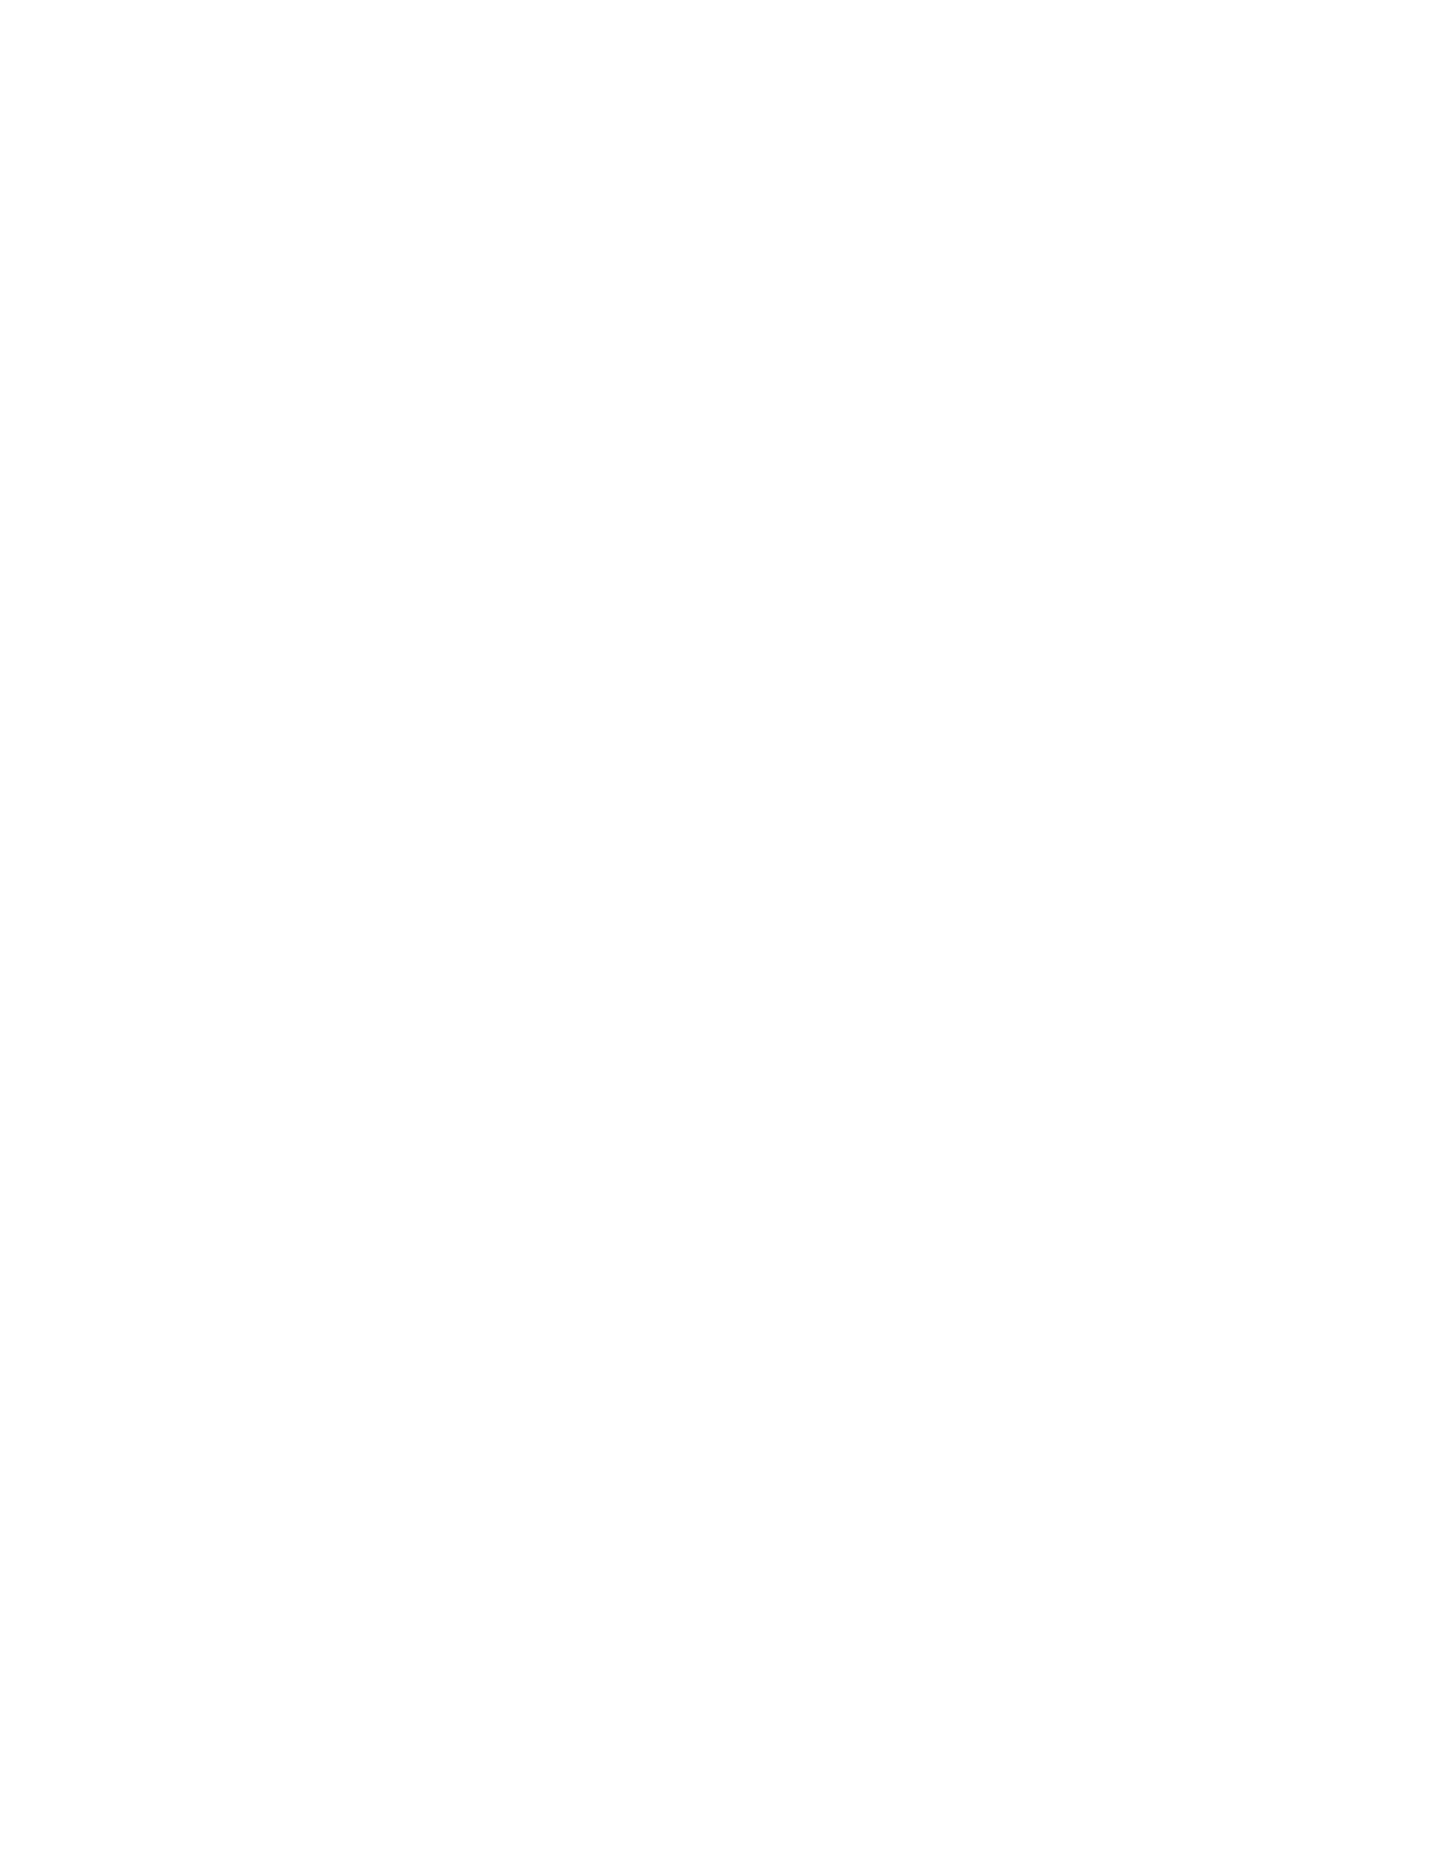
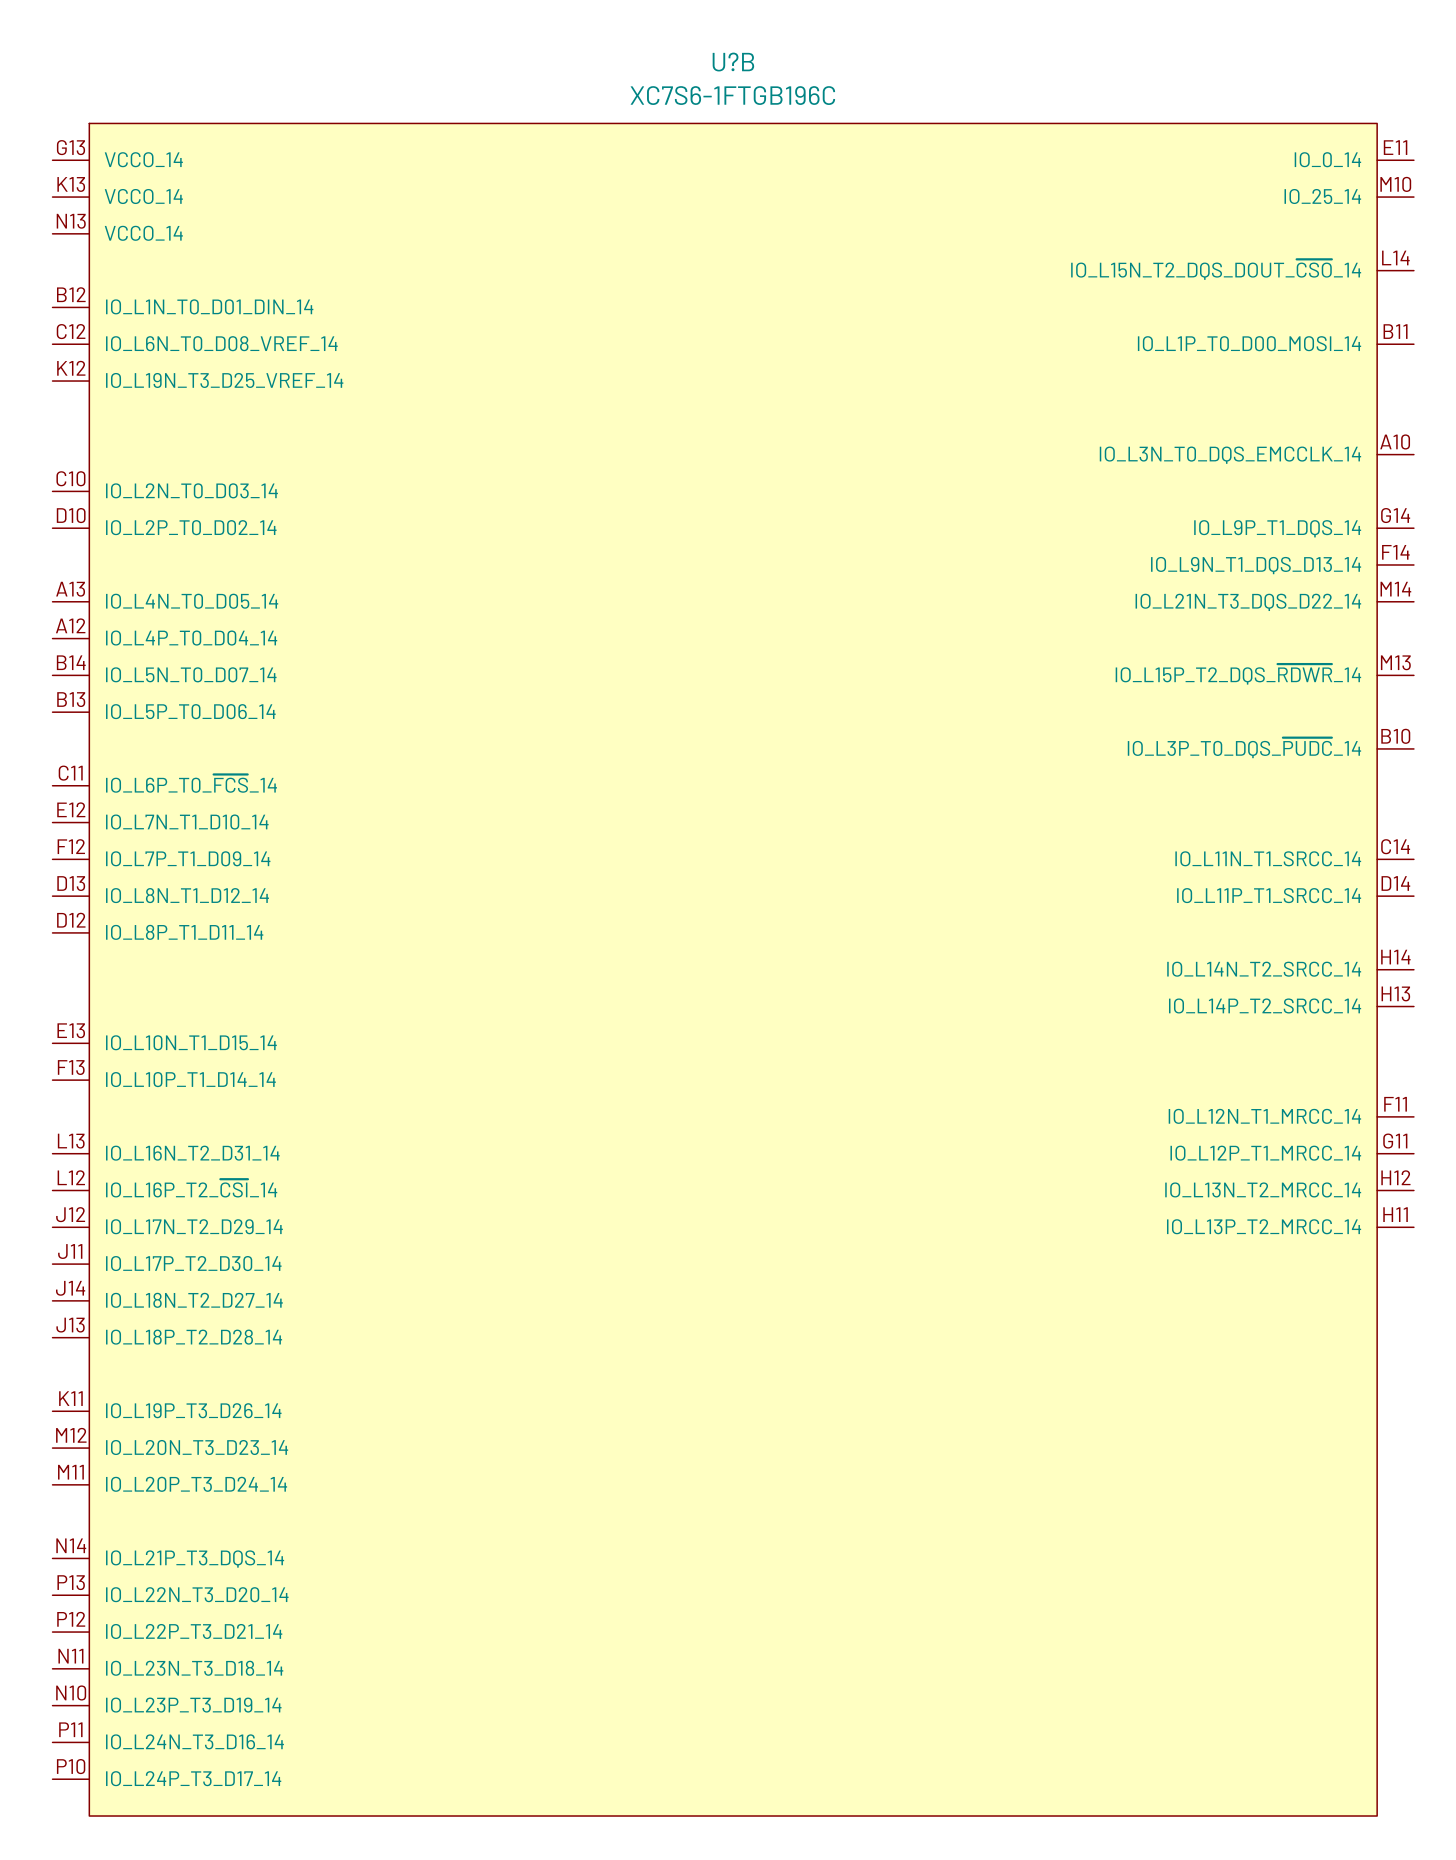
U?B: none -> XC7S6-1FTGB196C (733, 969)

